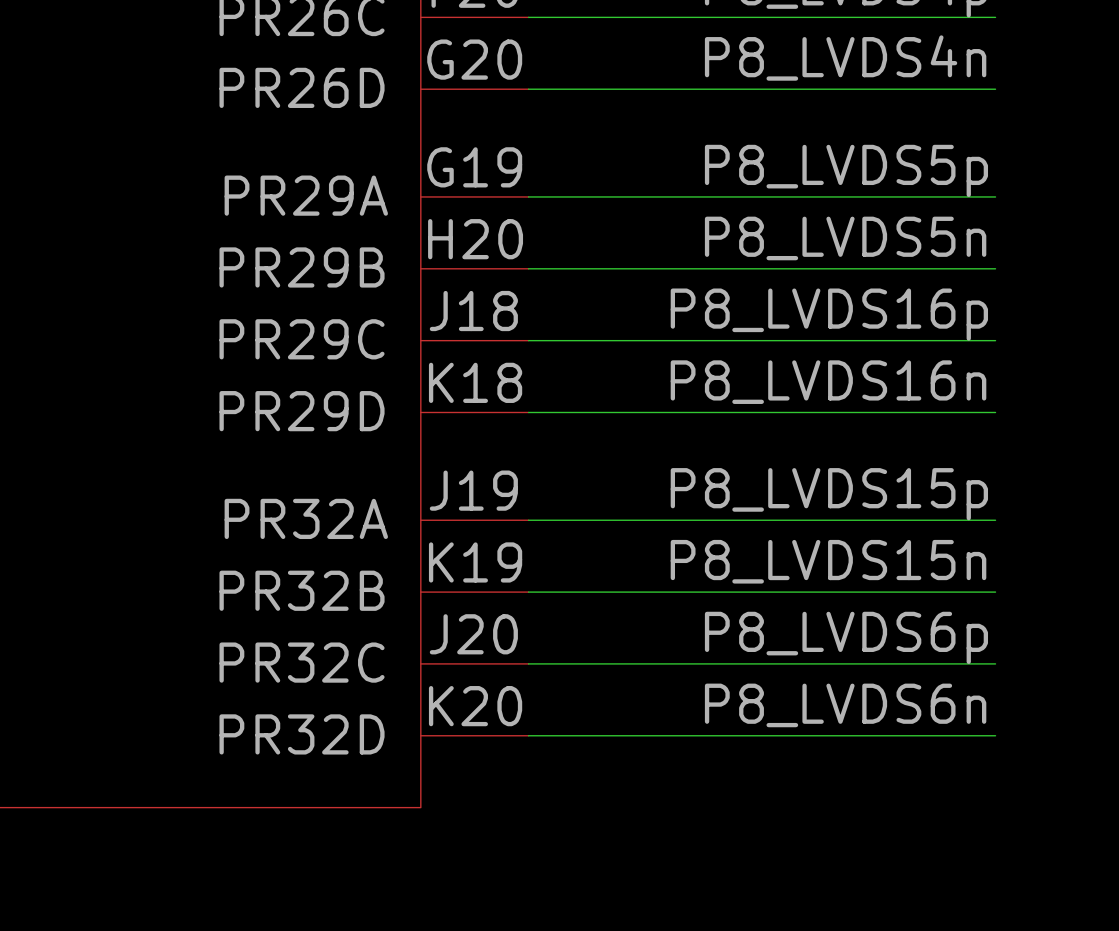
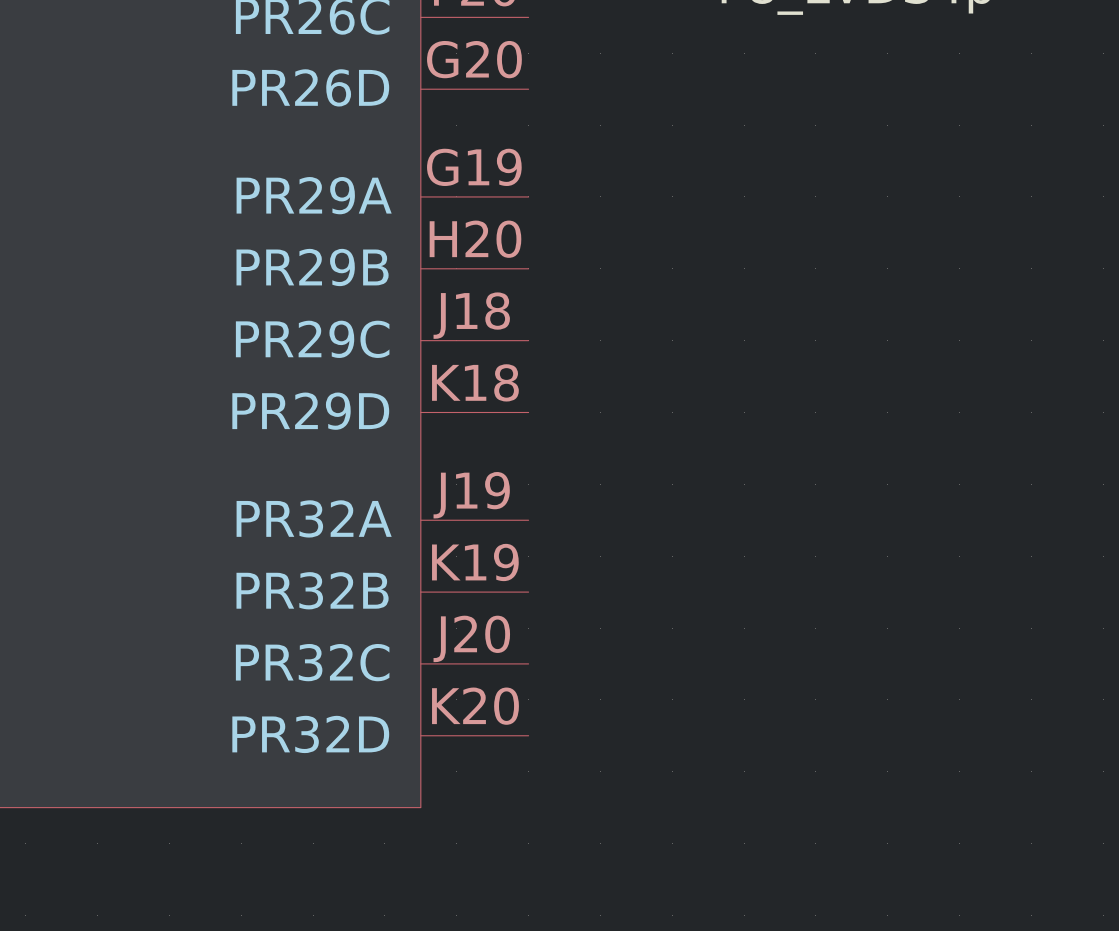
wire: (528, 17) (995, 17) -> none
label: P8_LVDS4n (845, 58) -> none
wire: (528, 89) (995, 89) -> none
label: P8_LVDS5p (846, 170) -> none
wire: (528, 196) (995, 196) -> none
label: P8_LVDS5n (845, 238) -> none
wire: (528, 268) (995, 268) -> none
label: P8_LVDS16p (829, 314) -> none
wire: (528, 340) (995, 340) -> none
label: P8_LVDS16n (828, 382) -> none
wire: (528, 412) (995, 412) -> none
label: P8_LVDS15p (829, 494) -> none
wire: (528, 520) (995, 520) -> none
label: P8_LVDS15n (828, 561) -> none
wire: (528, 592) (995, 592) -> none
label: P8_LVDS6p (846, 637) -> none
wire: (528, 663) (995, 663) -> none
label: P8_LVDS6n (845, 705) -> none
wire: (528, 735) (995, 735) -> none

